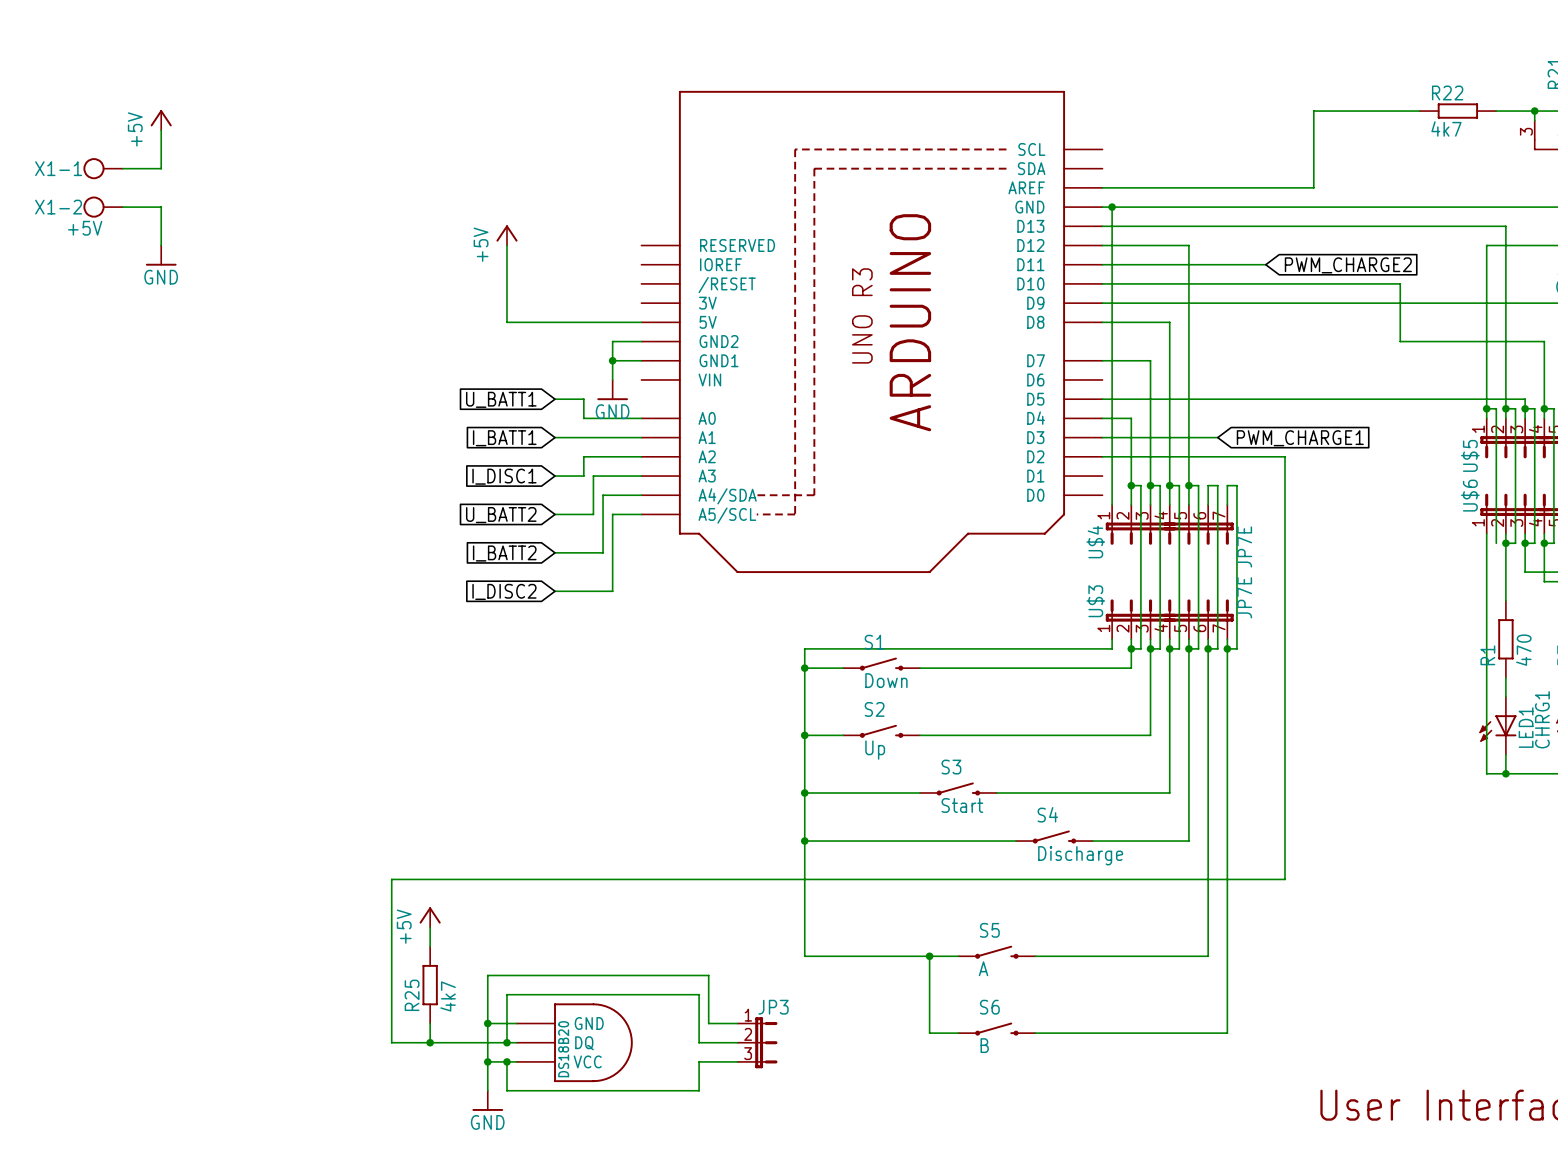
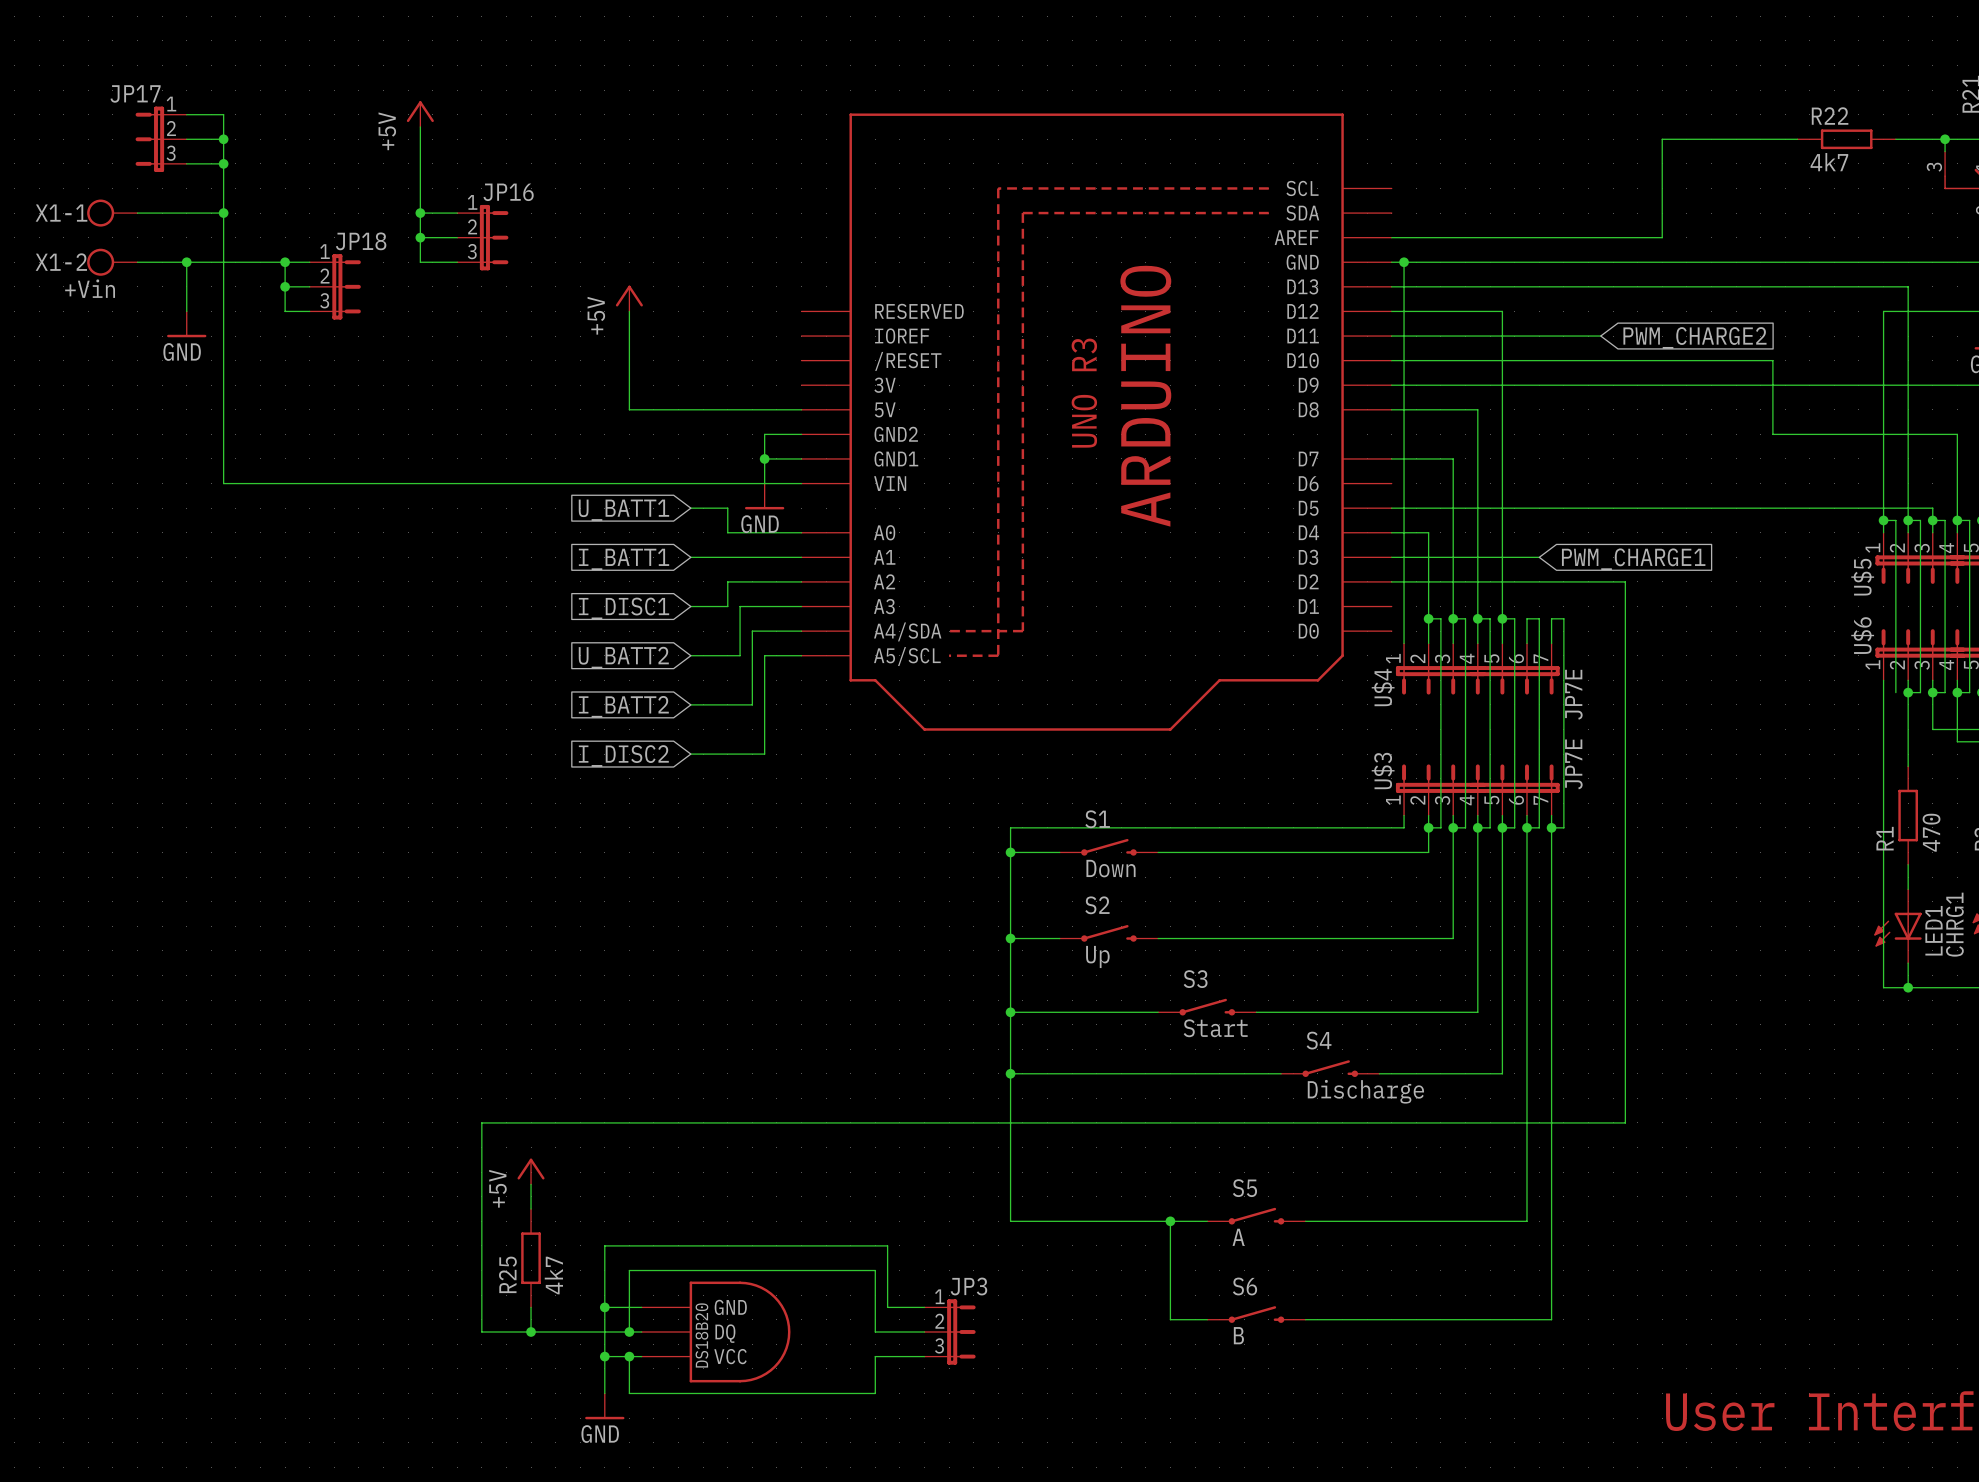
wire: none -> (186, 114) (223, 114) (223, 483) (801, 483)
wire: none -> (420, 126) (420, 262) (457, 262)
JP17: none -> (161, 139)
wire: none -> (186, 139) (223, 139)
junction: none -> (223, 139)
power symbol position: +5V (161, 120) -> +5V (420, 114)
wire: (161, 130) (161, 168) -> (186, 163) (223, 163)
junction: none -> (223, 163)
wire: none -> (186, 213) (223, 213)
junction: none -> (223, 213)
wire: none -> (420, 213) (457, 213)
junction: none -> (420, 213)
wire: none -> (420, 237) (457, 237)
junction: none -> (420, 237)
JP16: none -> (482, 237)
wire: none -> (186, 262) (309, 262)
junction: none -> (186, 262)
wire: none -> (285, 262) (285, 311) (309, 311)
junction: none -> (285, 262)
wire: none -> (285, 286) (309, 286)
junction: none -> (285, 286)
JP18: none -> (335, 286)
X1-2 value: +5V (85, 228) -> +Vin (90, 288)

